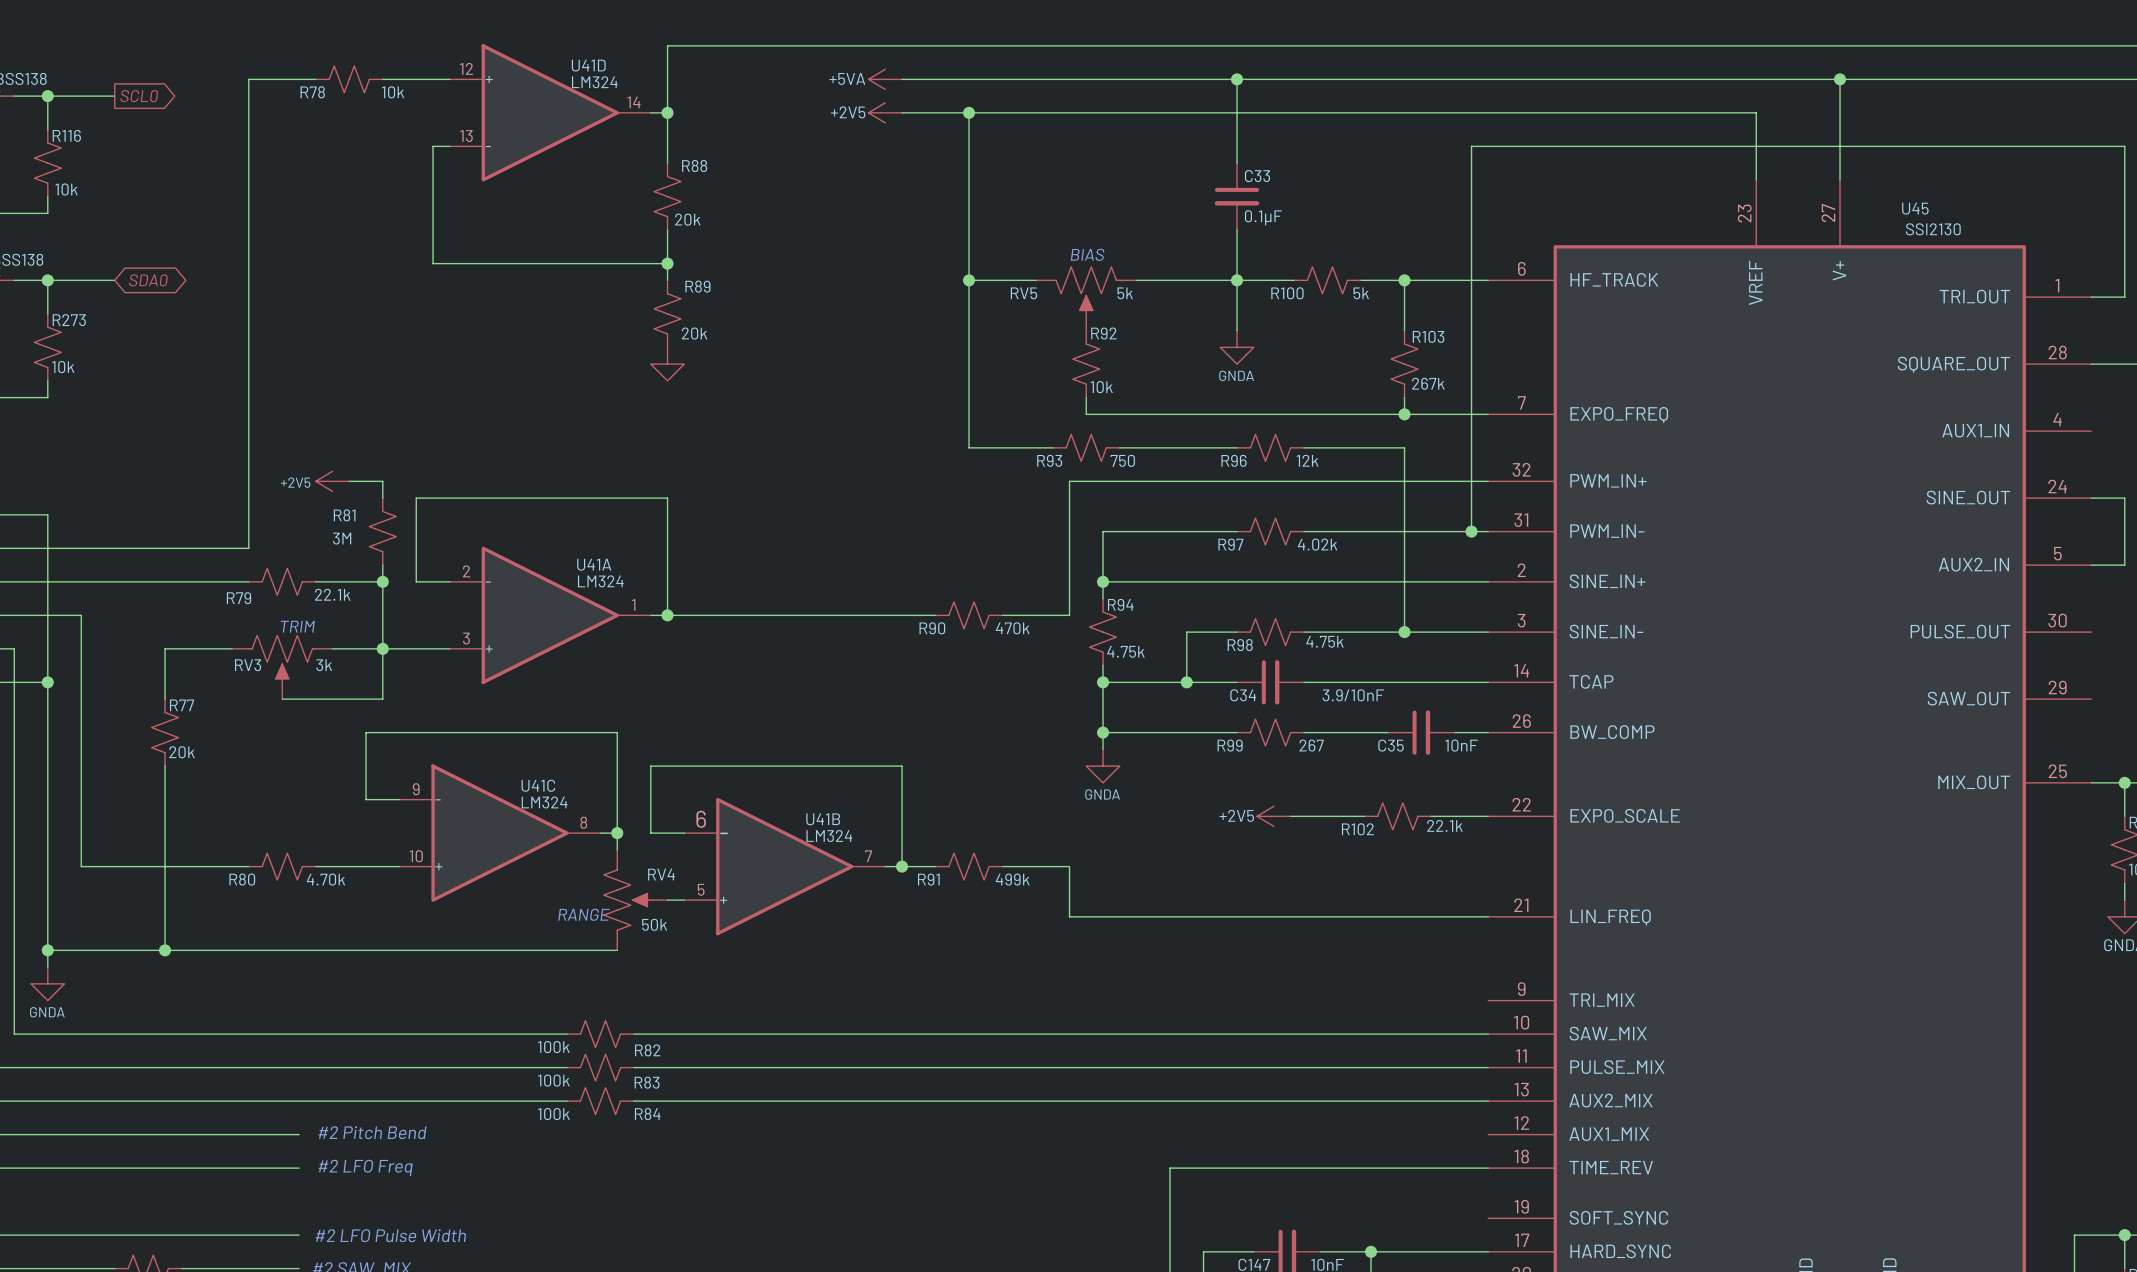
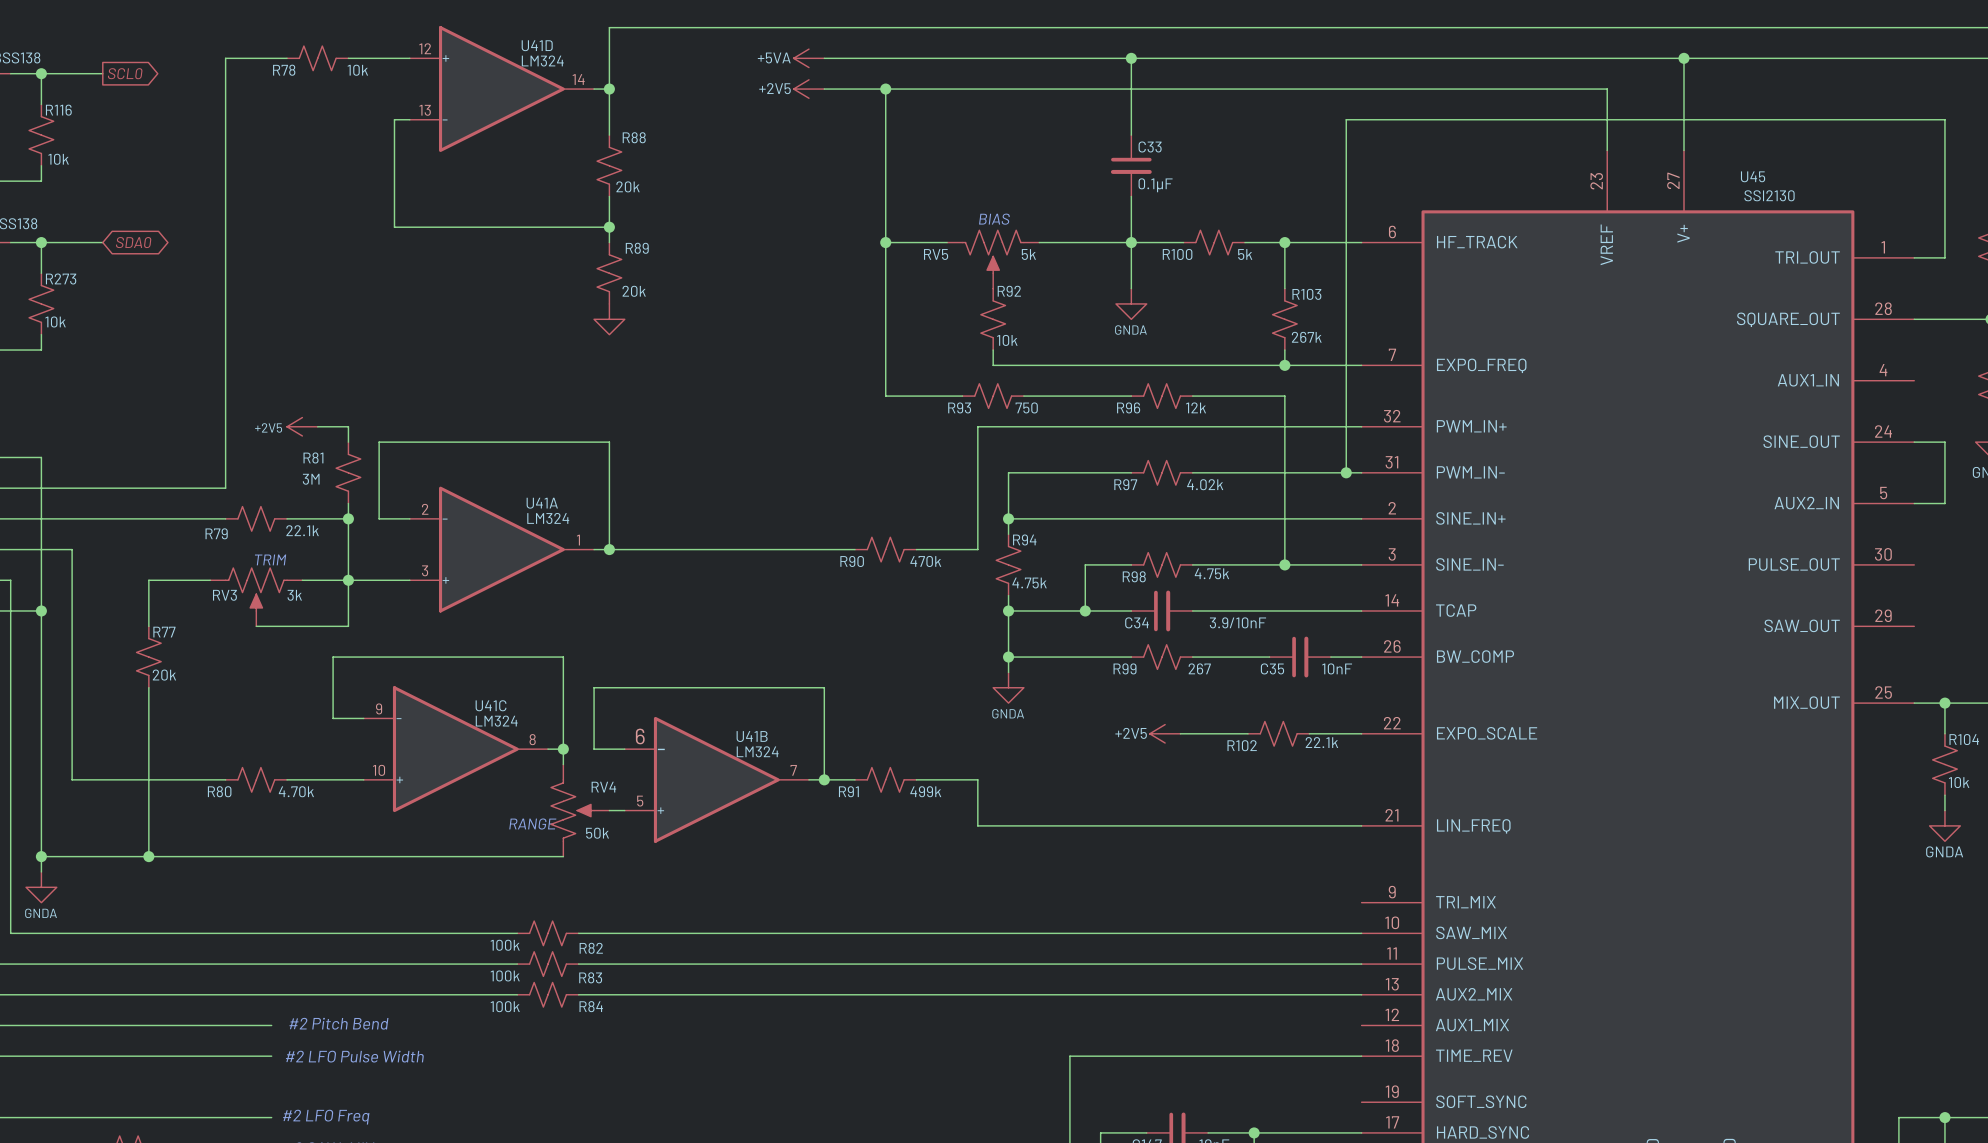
text: #2 LFO Freq (365, 1167) -> #2 LFO Pulse Width (354, 1056)
text: #2 LFO Pulse Width (390, 1235) -> #2 LFO Freq (326, 1117)

